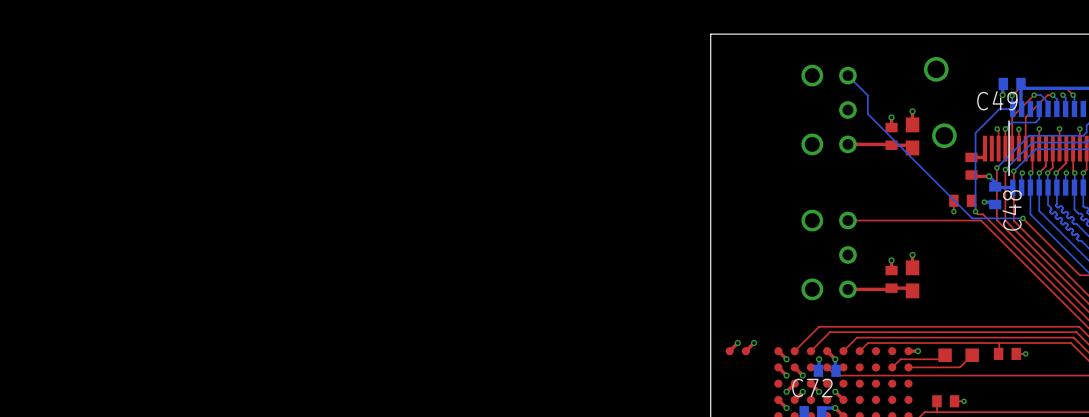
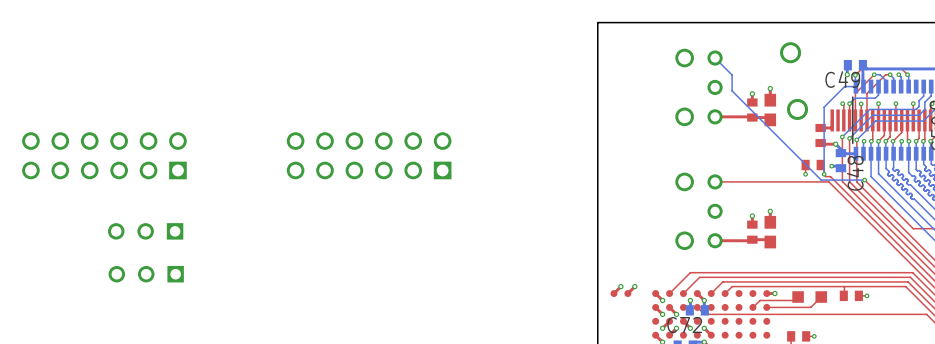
part: none -> (104, 155)
part: none -> (369, 155)
part: none -> (145, 231)
part: none -> (146, 274)

